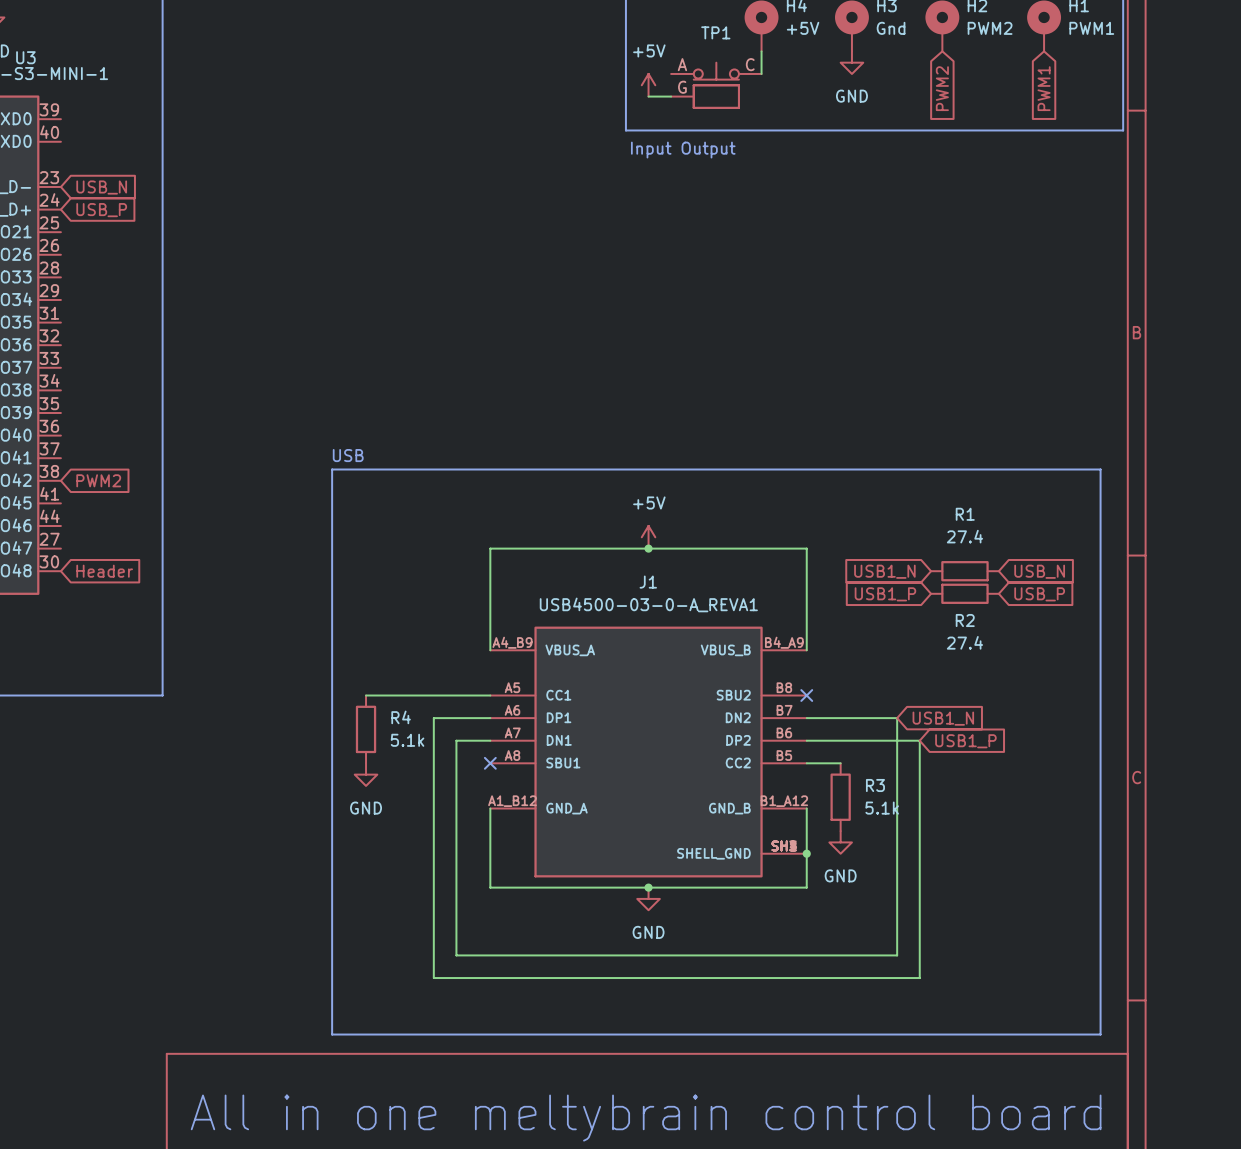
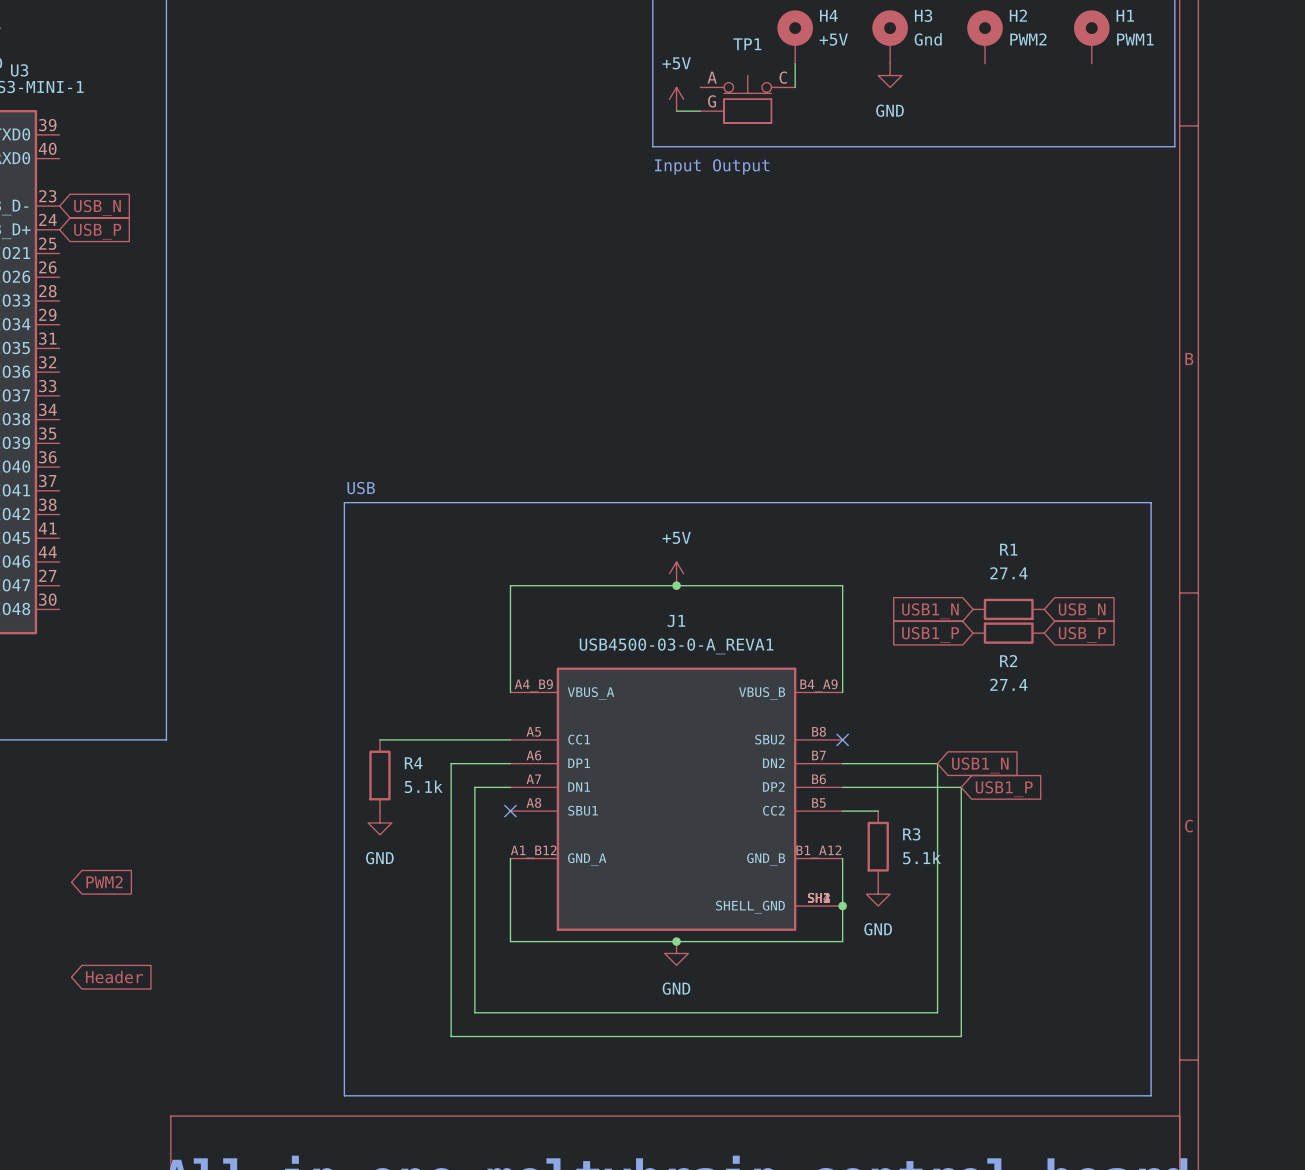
global label: PWM2 (942, 88) -> none
global label: PWM1 (1044, 88) -> none
global label: PWM2 (98, 480) -> none
global label: Header (104, 571) -> none
global label: none -> PWM2 (104, 882)
global label: none -> Header (114, 977)

